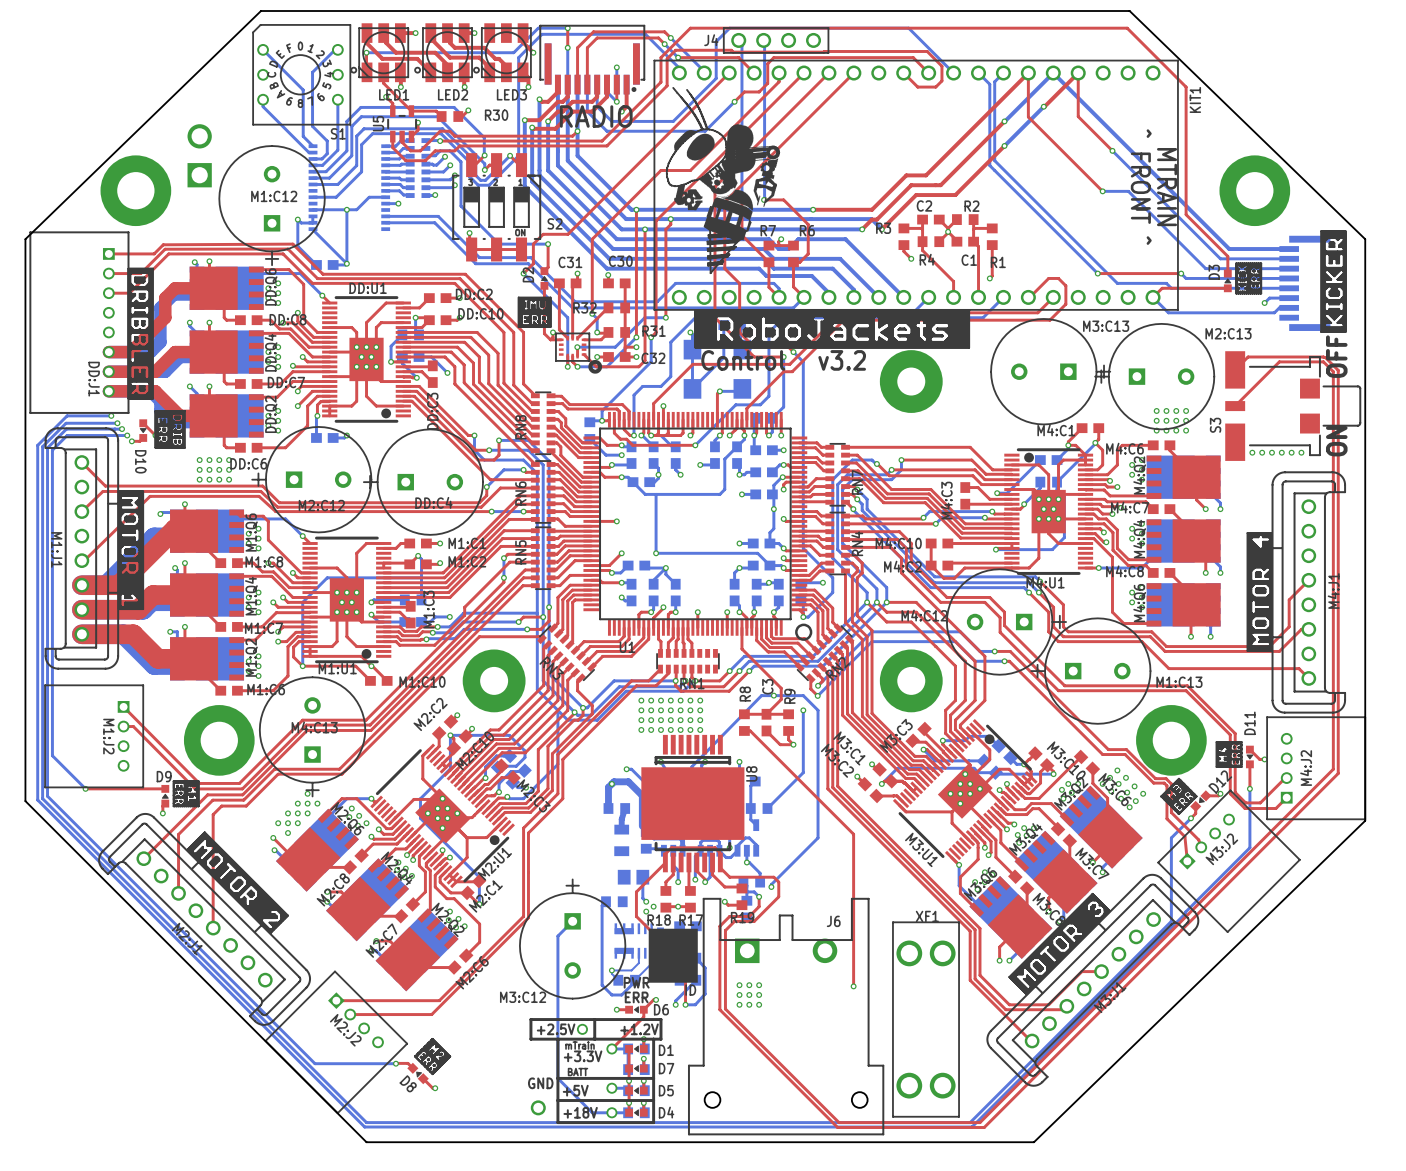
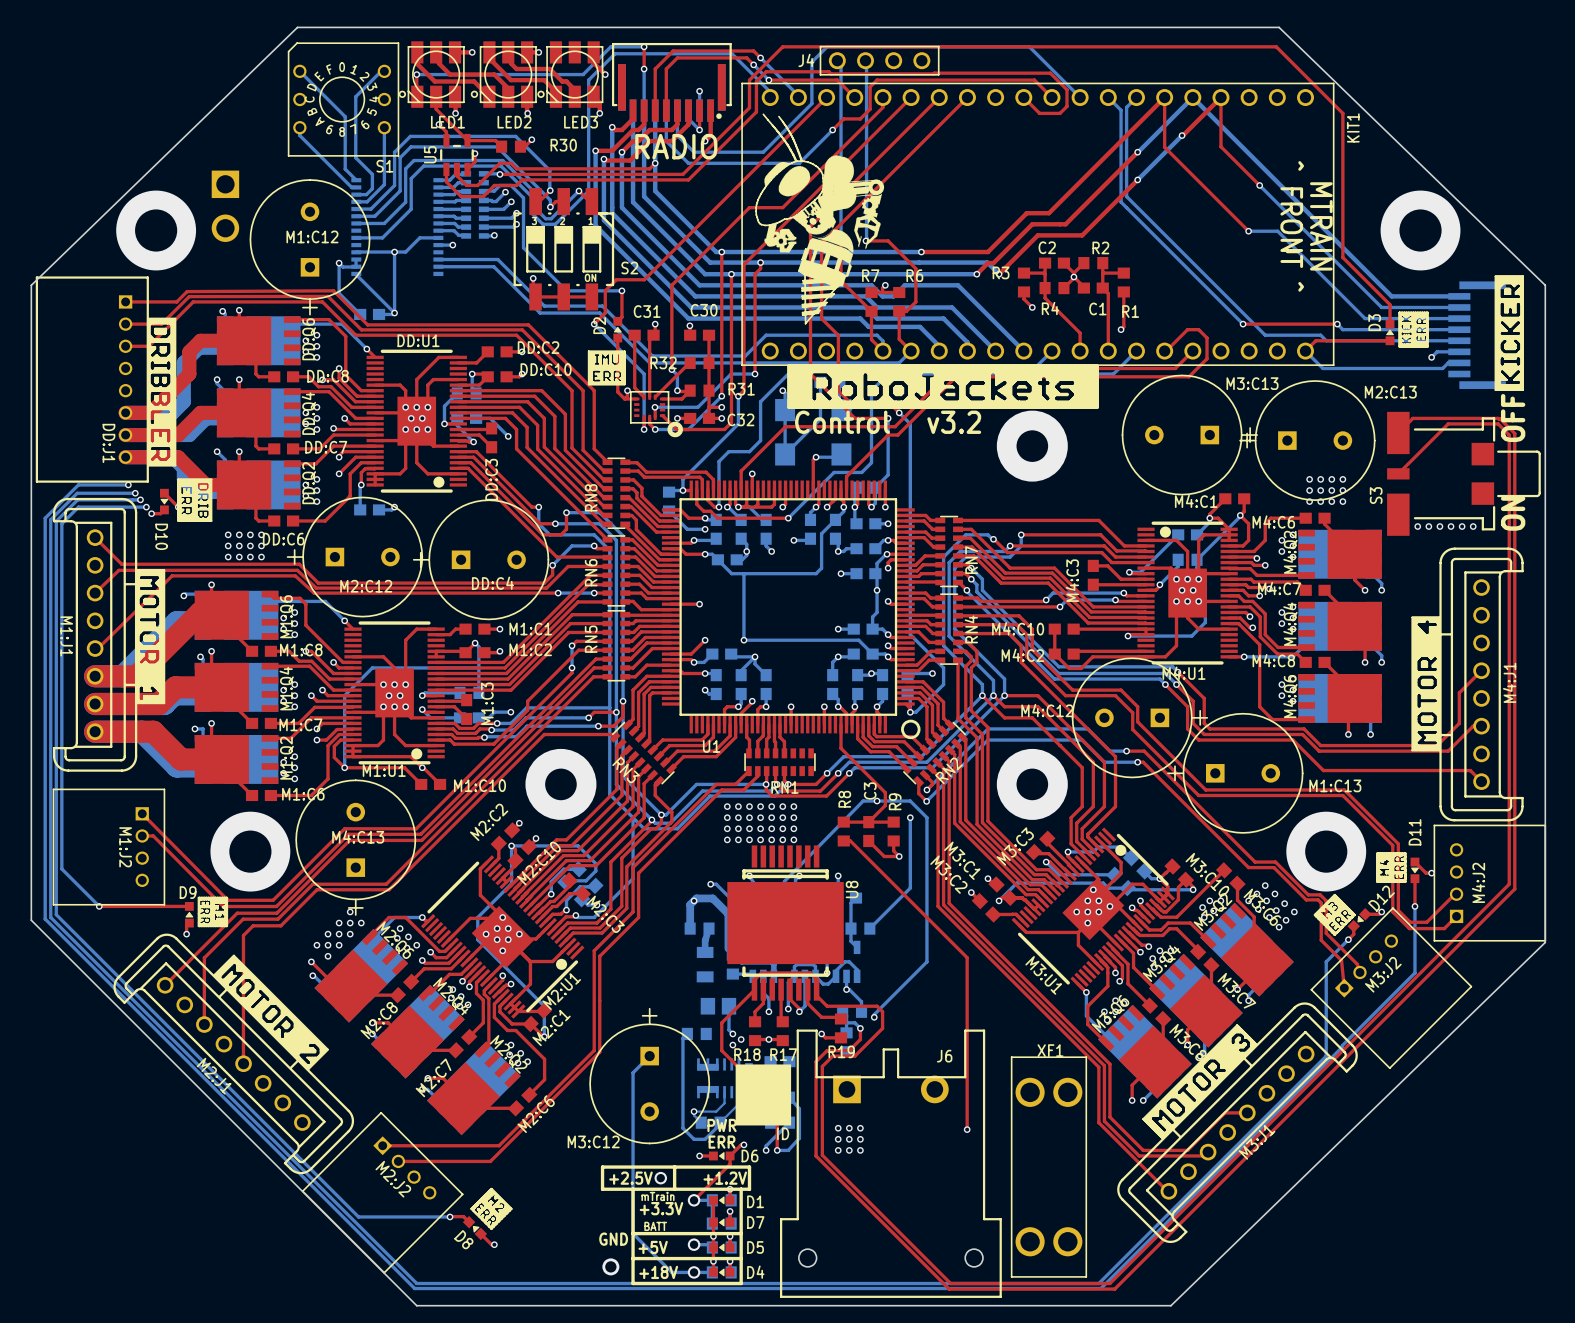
part rotation: 0° (199, 155) -> 180° (225, 206)

